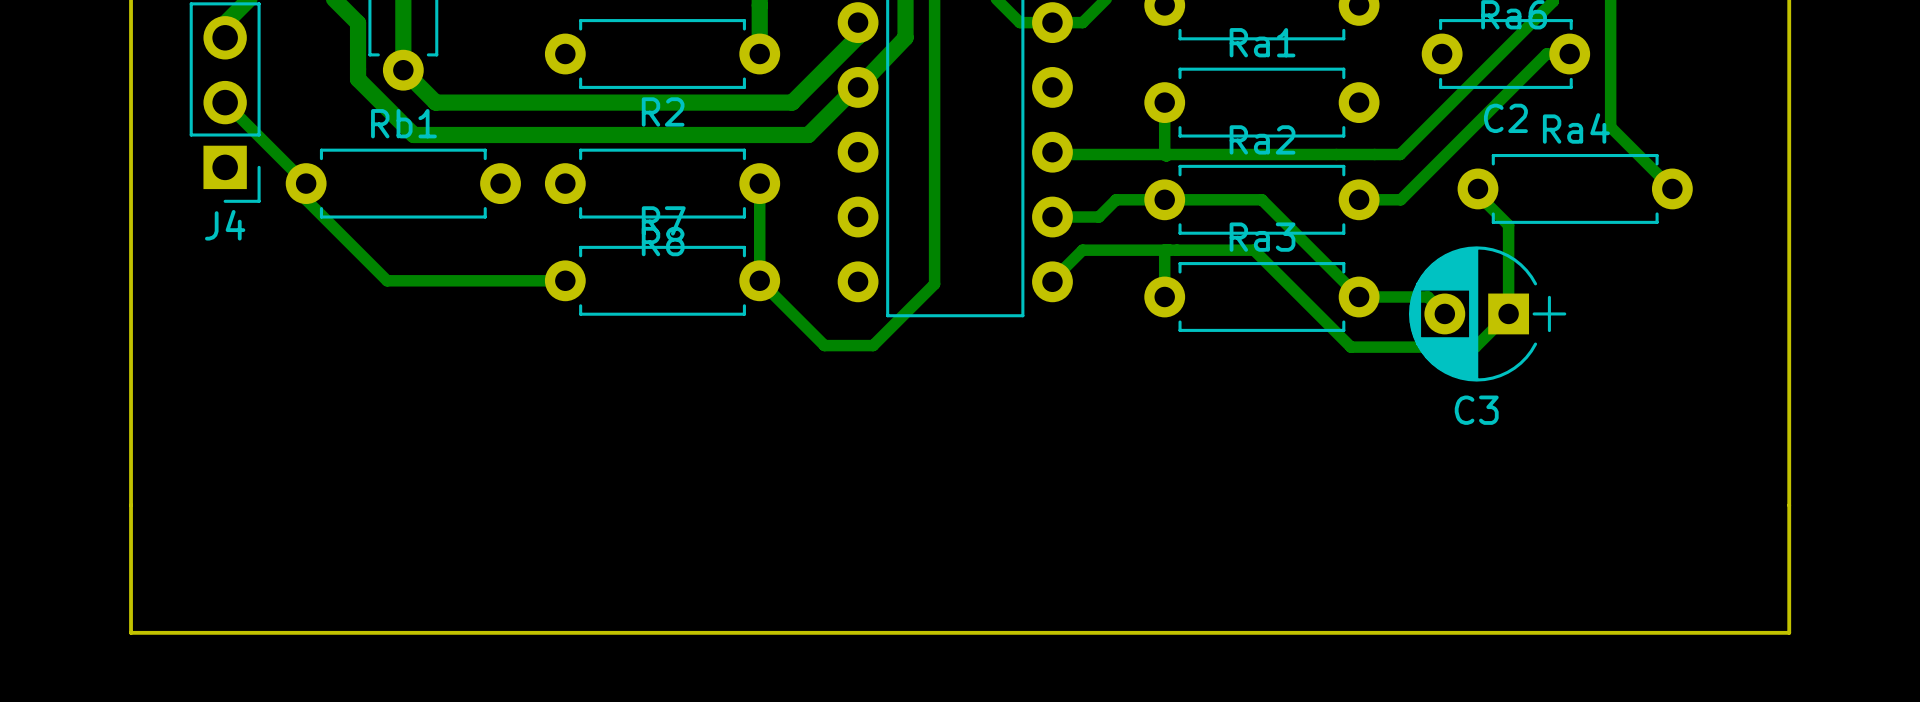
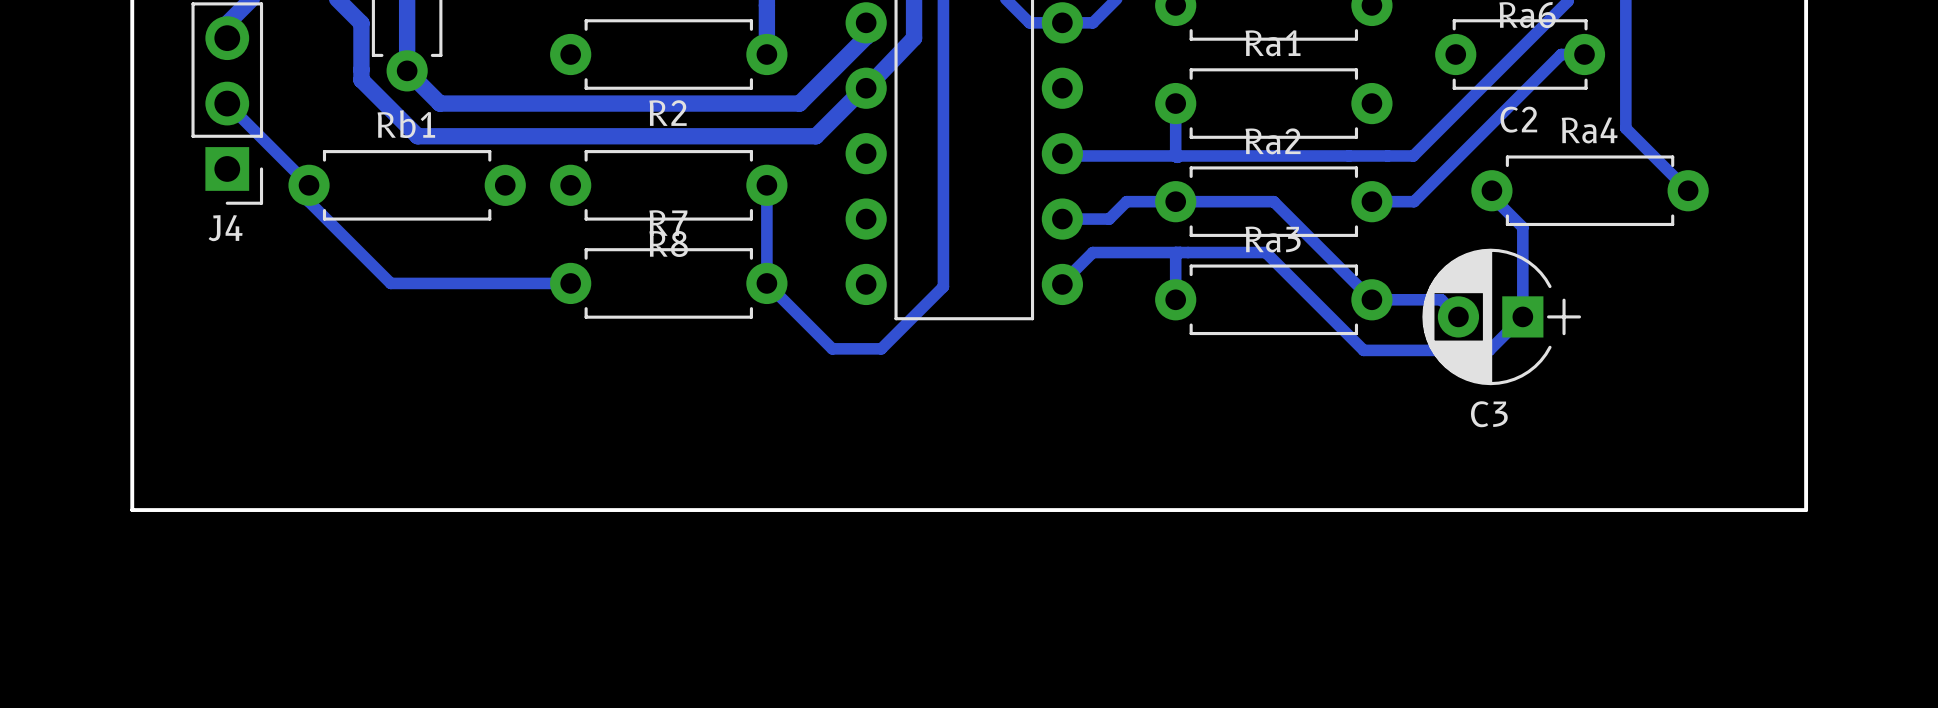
board edge: (131, 505) (131, 632) (1789, 632) (1789, 505) -> (132, 510) (1806, 510)

